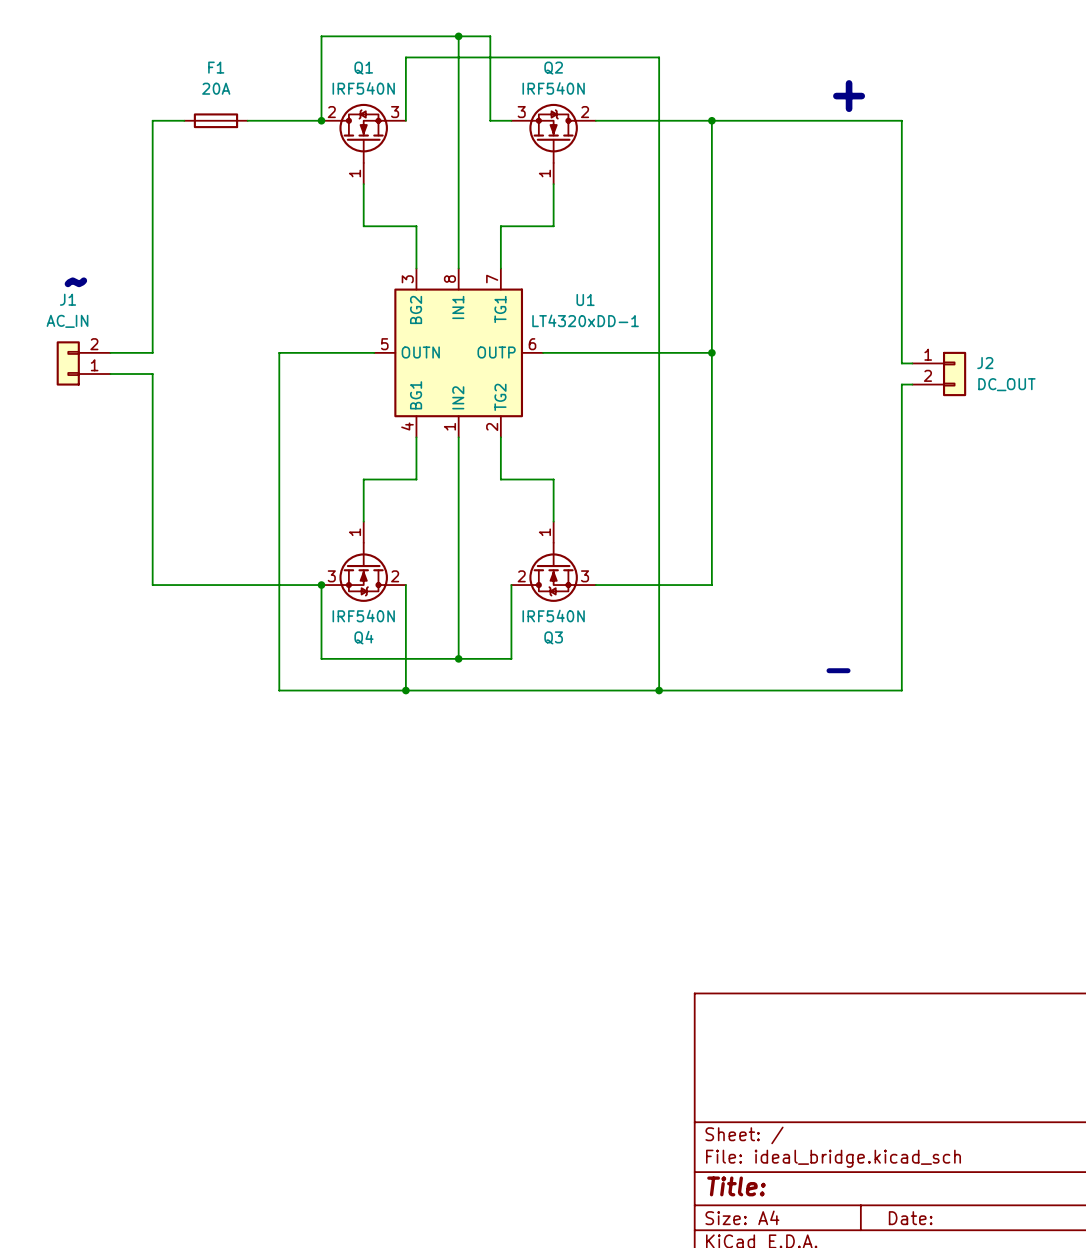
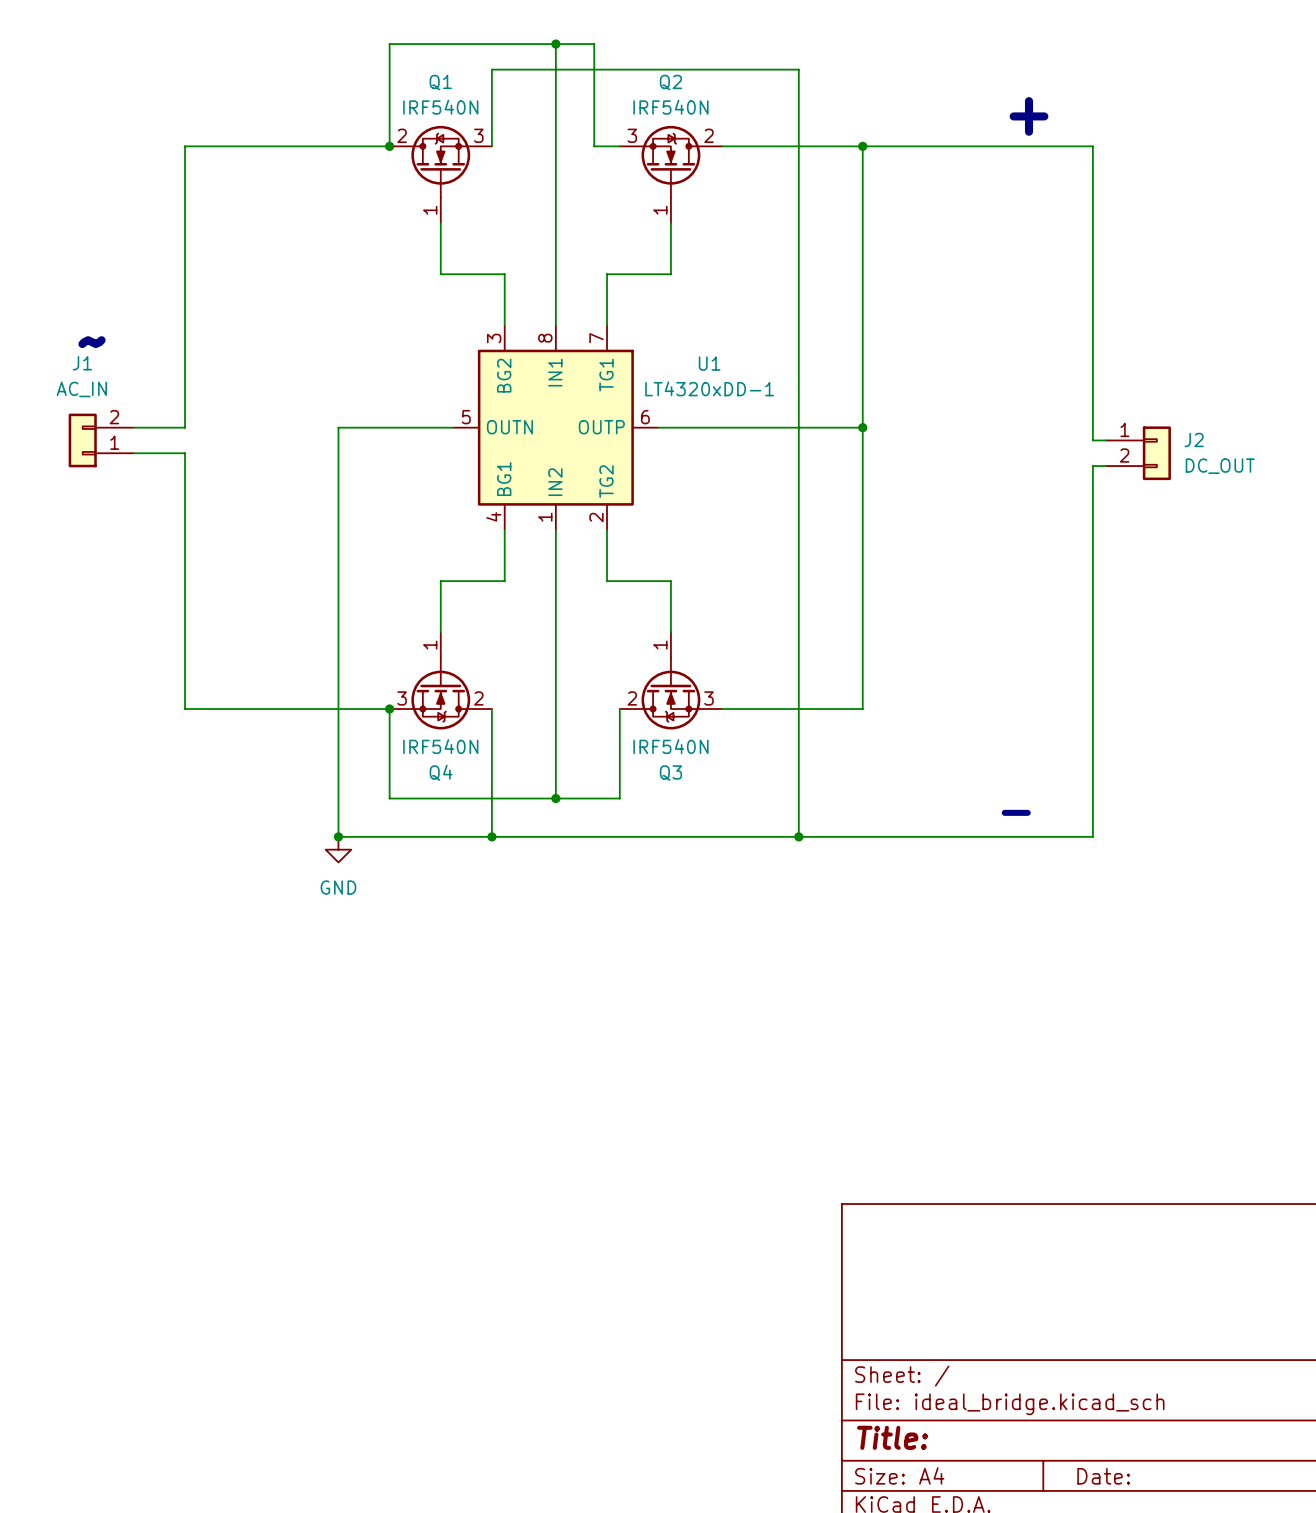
F1: 20A (215, 120) -> none
junction: none -> (338, 836)
power symbol: none -> GND (338, 849)

